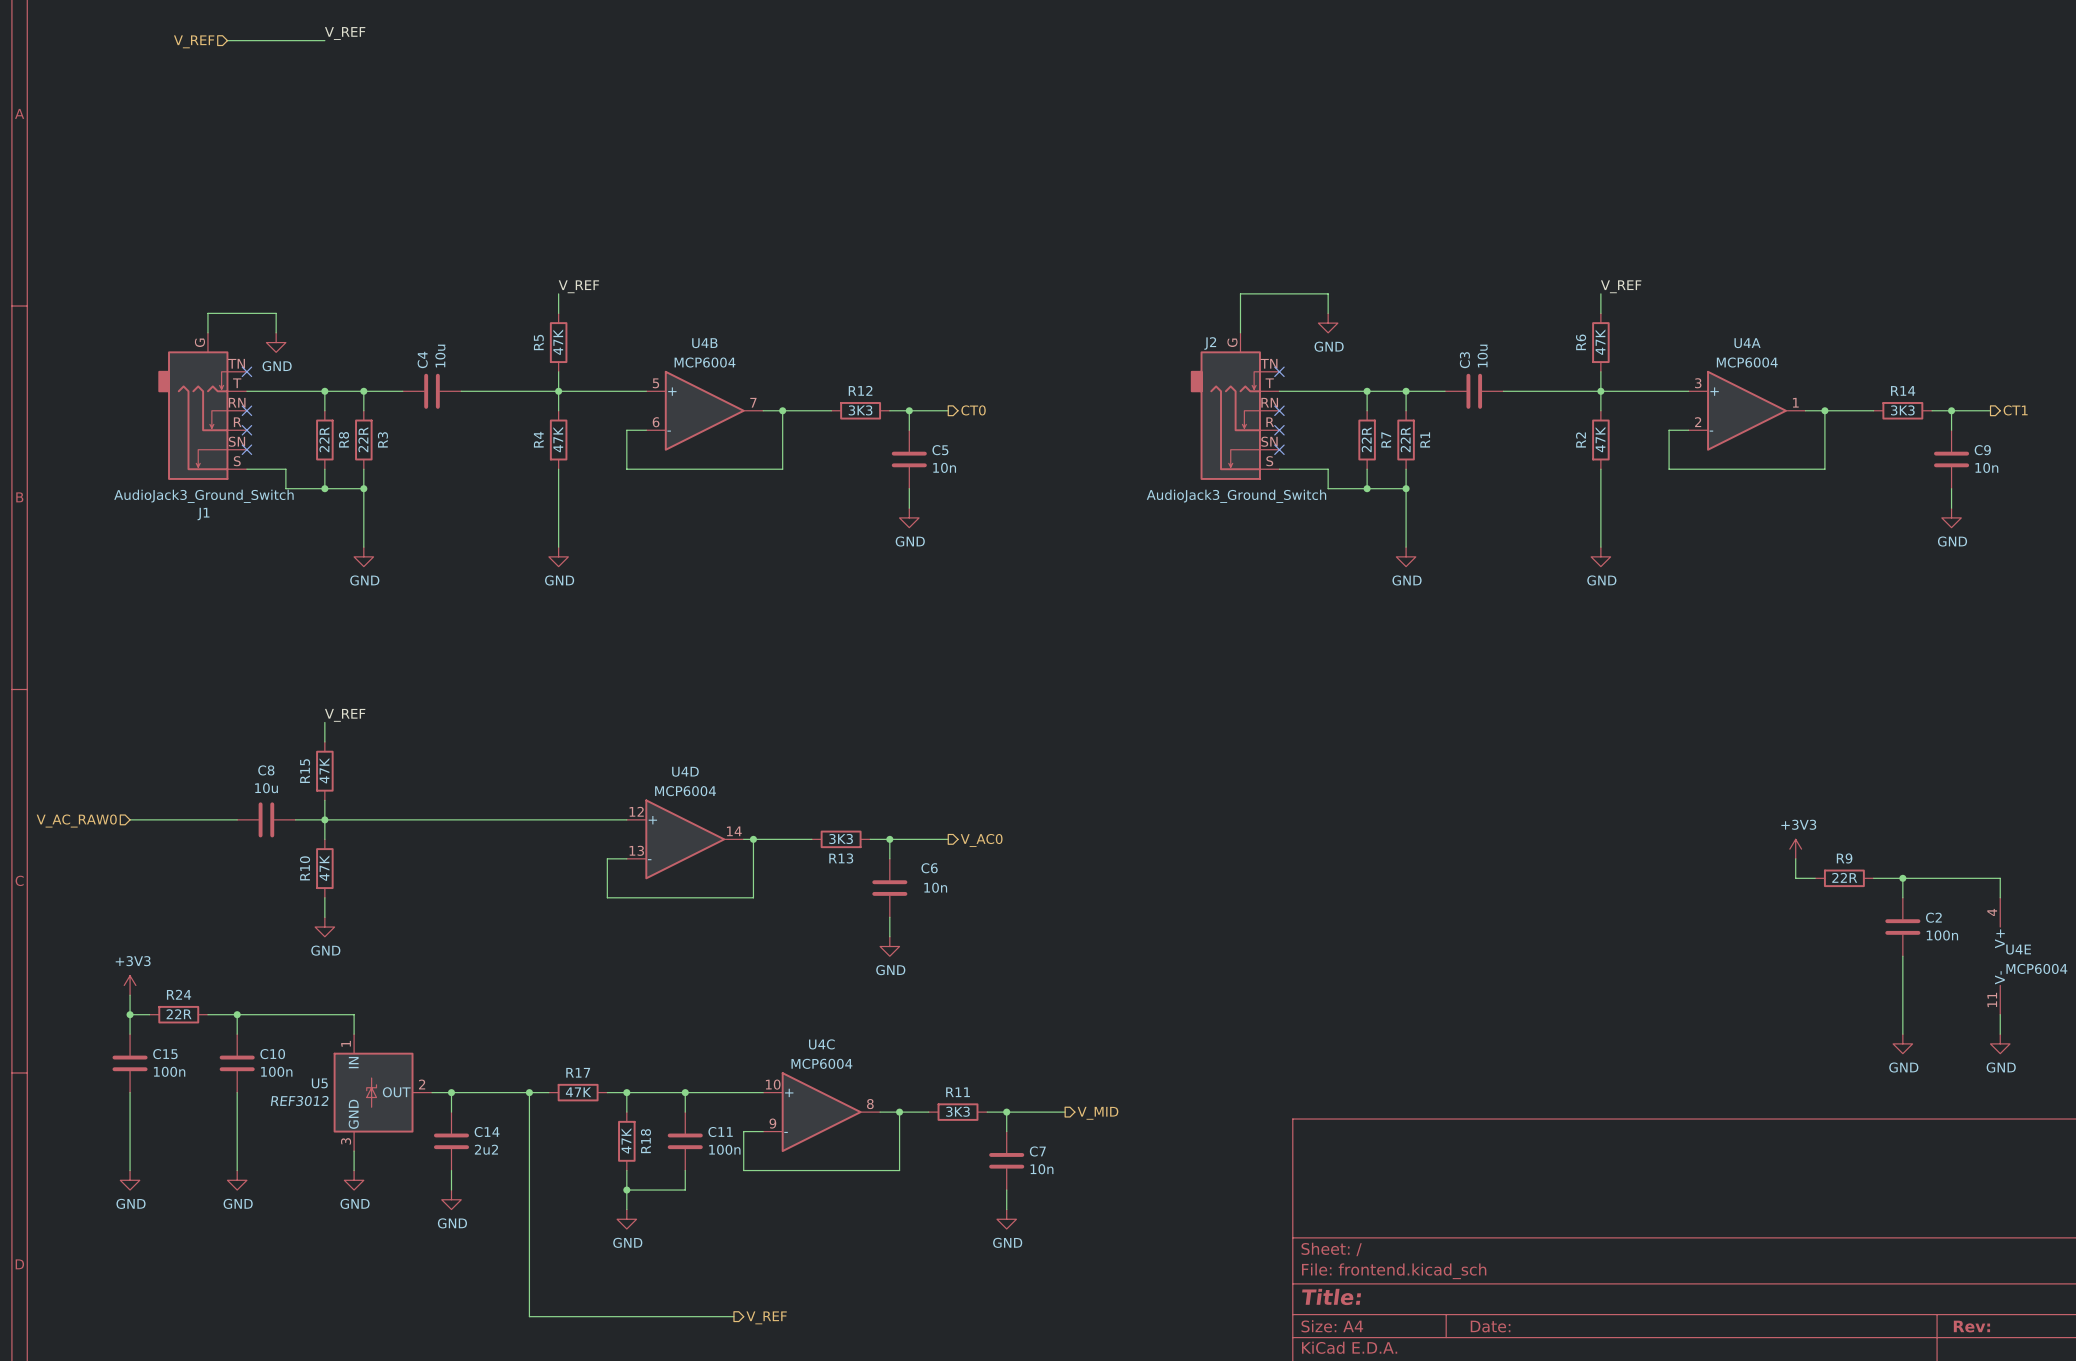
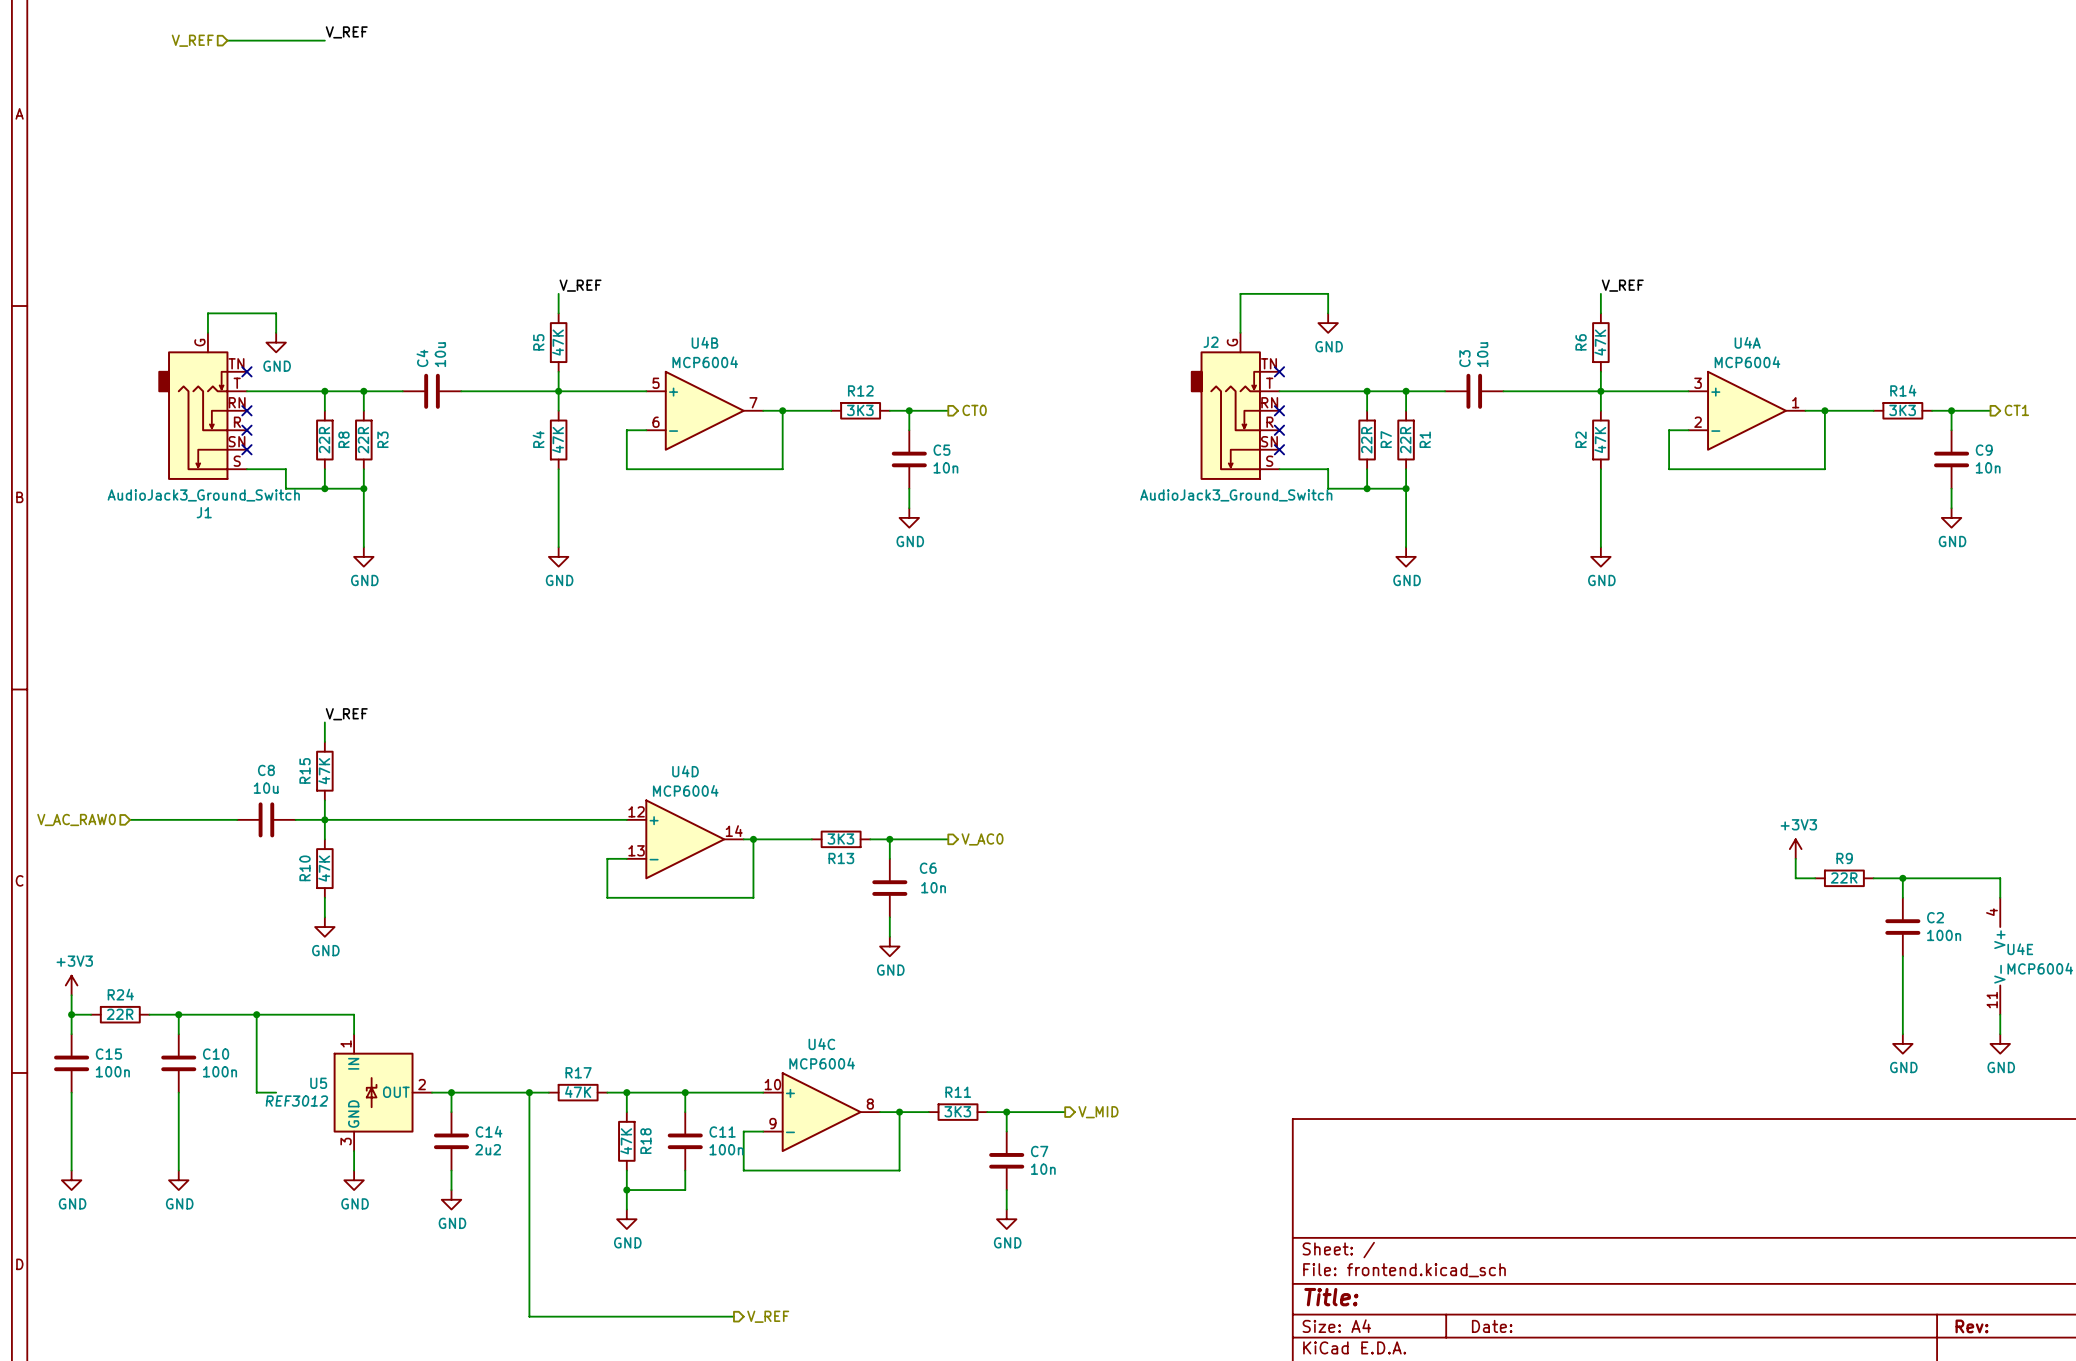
power symbol position: +3V3 (130, 985) -> +3V3 (71, 985)
wire: (130, 995) (130, 1034) -> (71, 995) (71, 1034)
wire: none -> (71, 1014) (91, 1014)
junction: none -> (71, 1014)
junction: (130, 1014) -> none
junction: none -> (178, 1014)
R24 position: (178, 1014) -> (120, 1014)
wire: (237, 1014) (237, 1034) -> (178, 1014) (178, 1034)
junction position: (237, 1014) -> (256, 1014)
wire: none -> (256, 1014) (256, 1092) (276, 1092)
C15 position: (130, 1063) -> (71, 1063)
C10 position: (237, 1063) -> (178, 1063)
wire: (130, 1092) (130, 1170) -> (71, 1092) (71, 1170)
wire: (237, 1092) (237, 1170) -> (178, 1092) (178, 1170)
power symbol: none -> GND (71, 1180)
power symbol: GND (130, 1180) -> none
power symbol: none -> GND (178, 1180)
power symbol: GND (237, 1180) -> none

